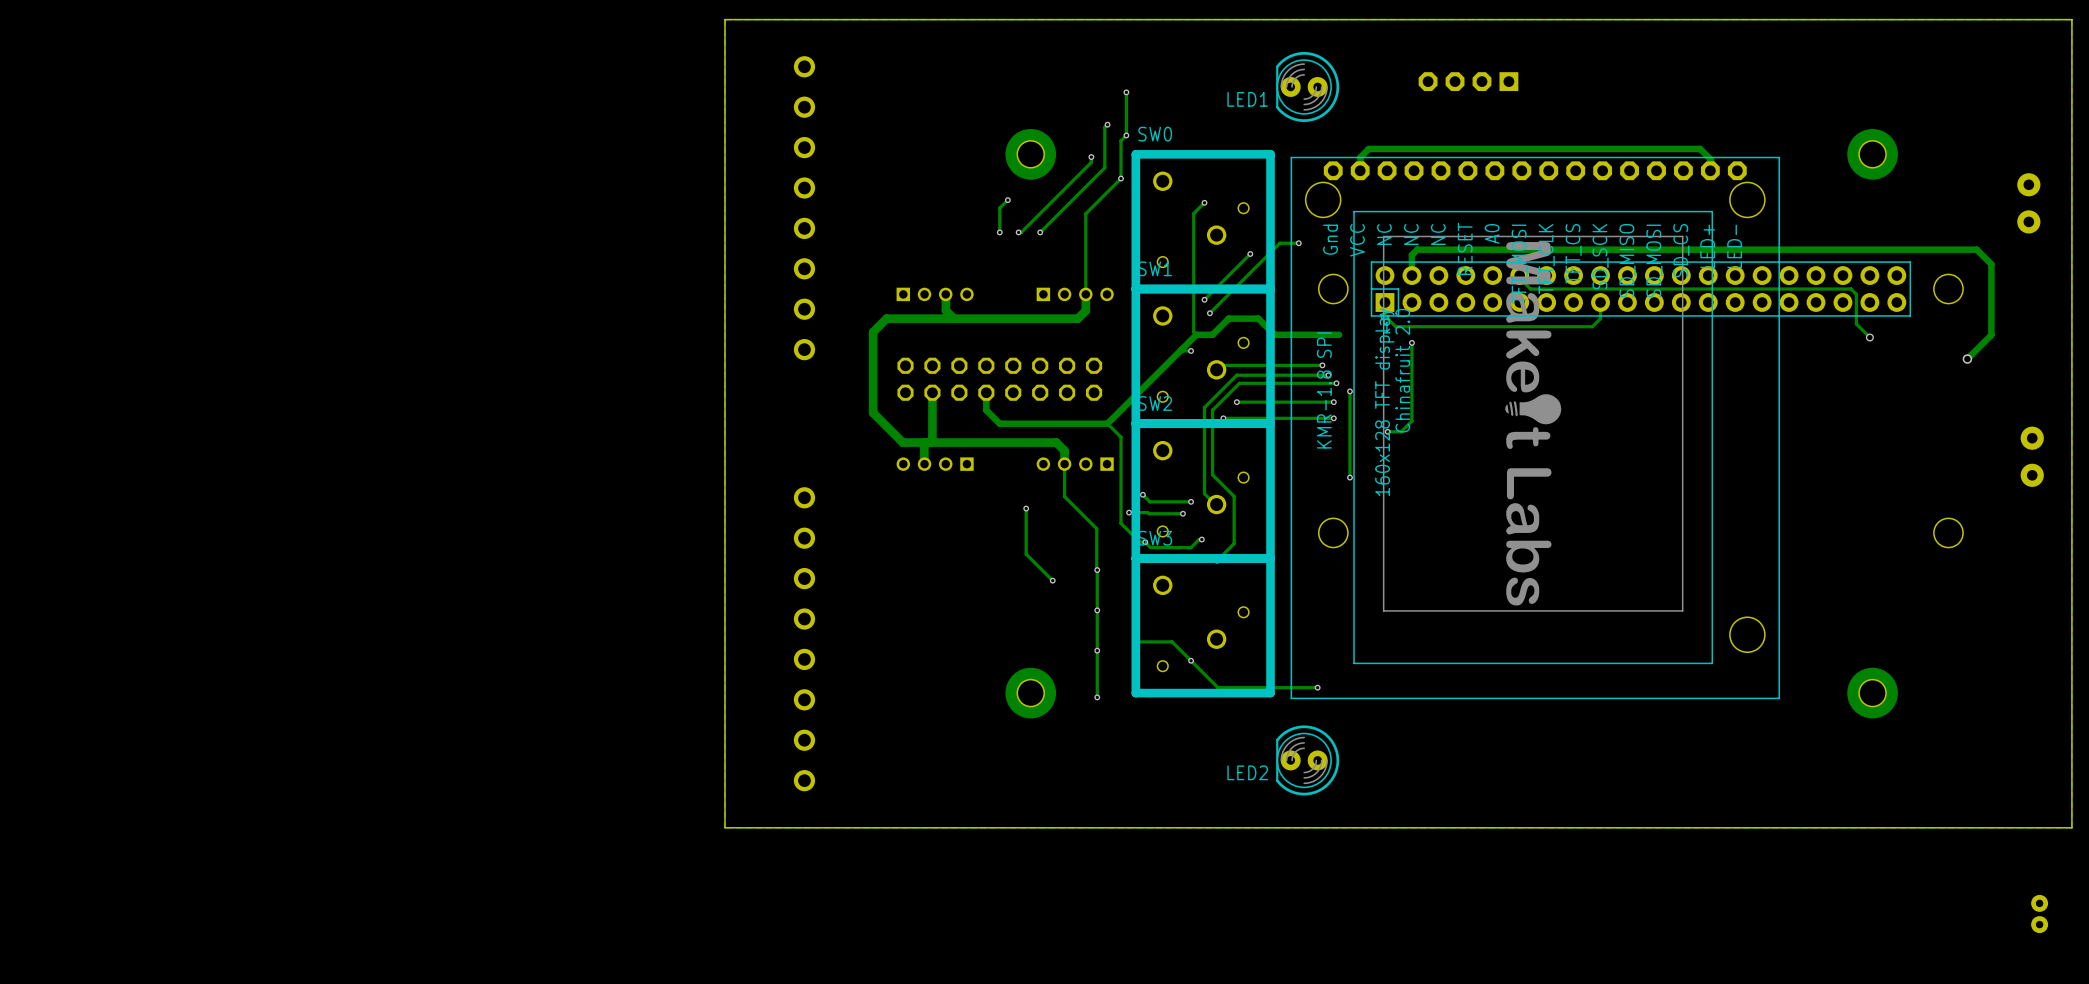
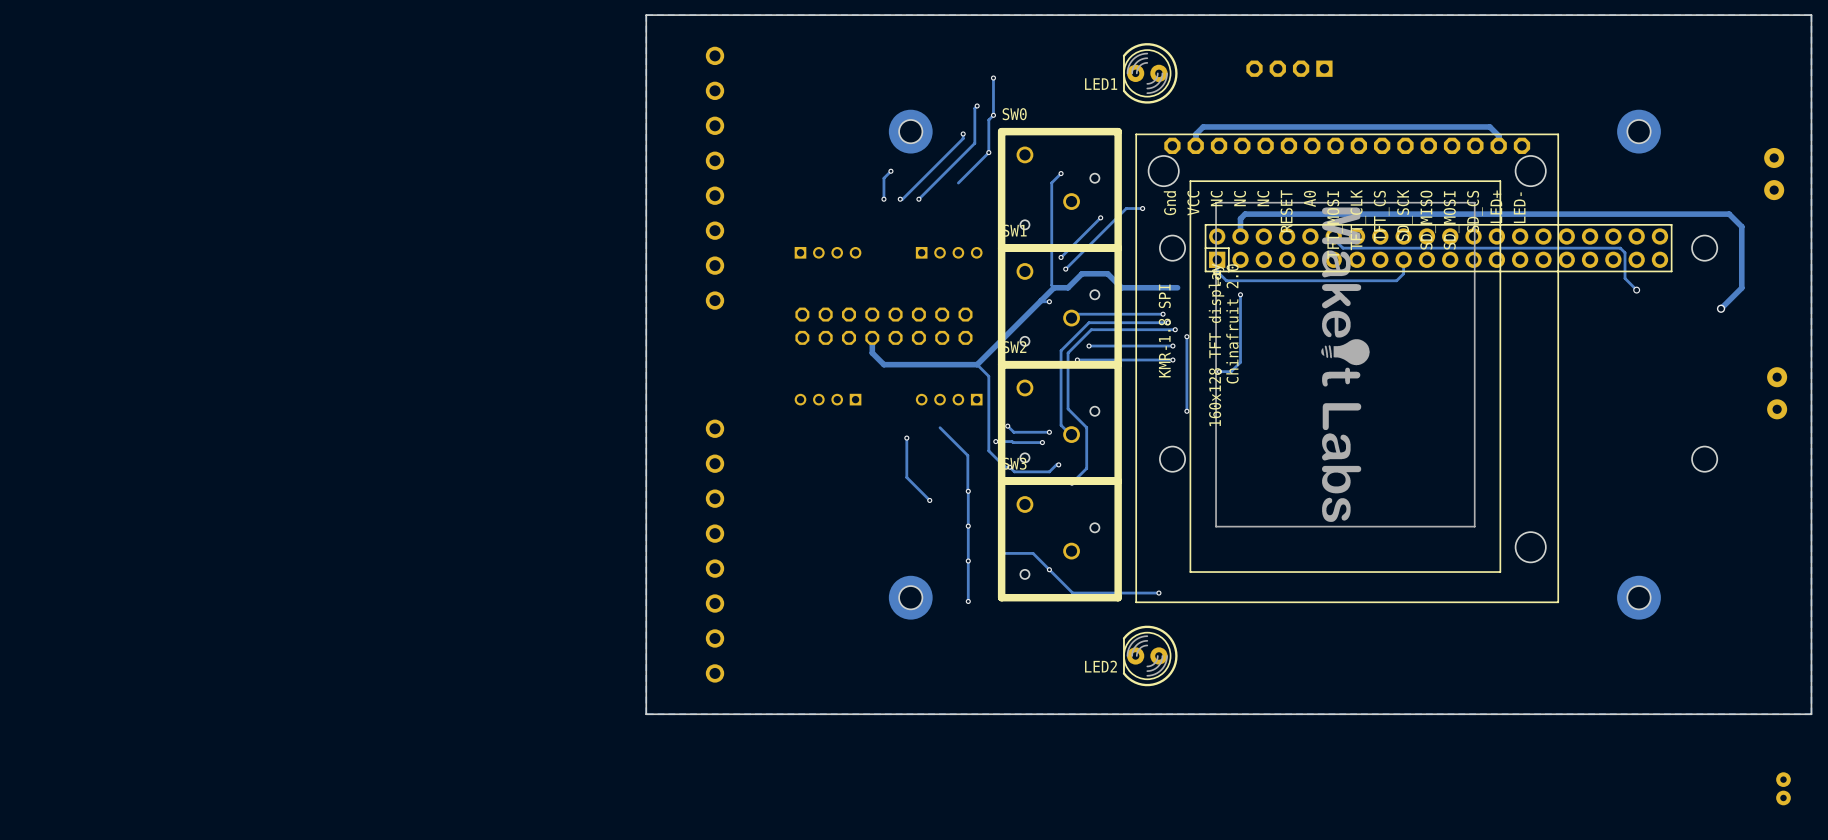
track: (1085, 213) (1085, 310) (1077, 318) (886, 318) (873, 332) (873, 412) (902, 442) (1056, 442) (1064, 450) (1064, 496) -> none
track: (945, 294) (945, 310) (953, 318) -> none
track: (932, 392) (932, 439) (929, 442) -> none
track: (924, 442) (924, 464) -> none

